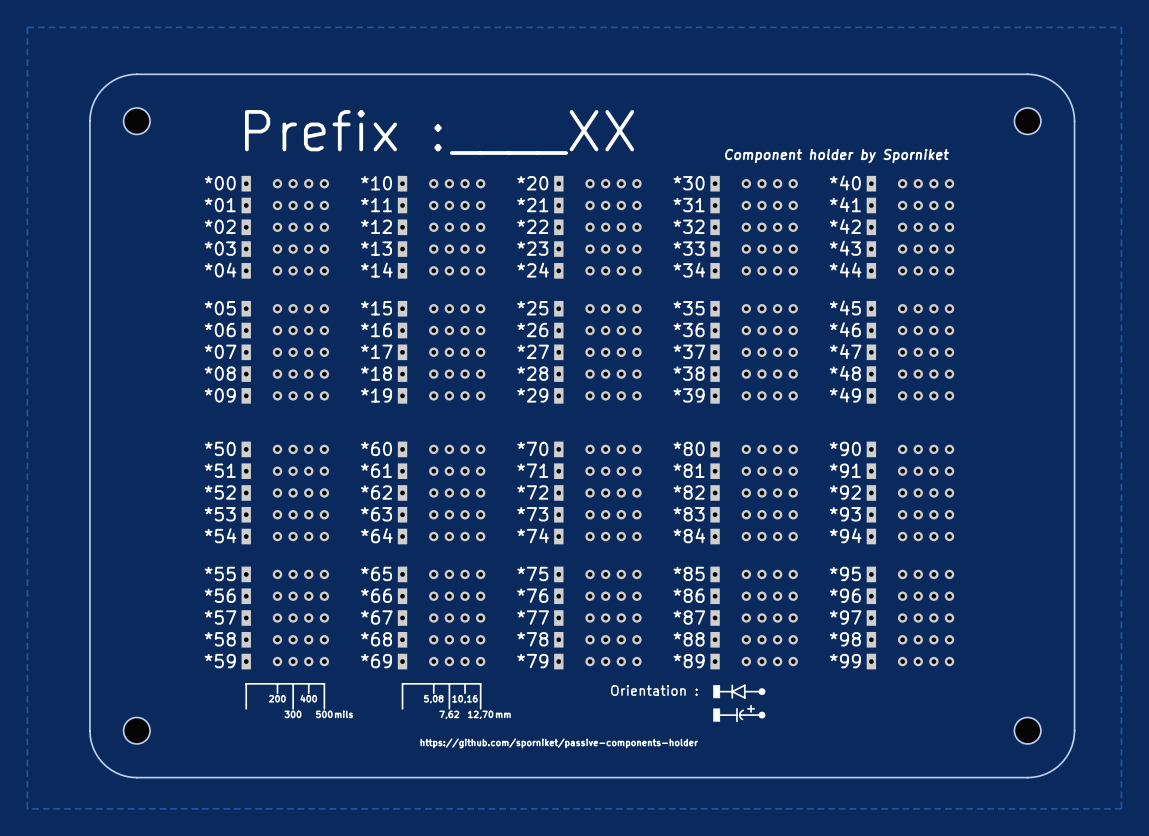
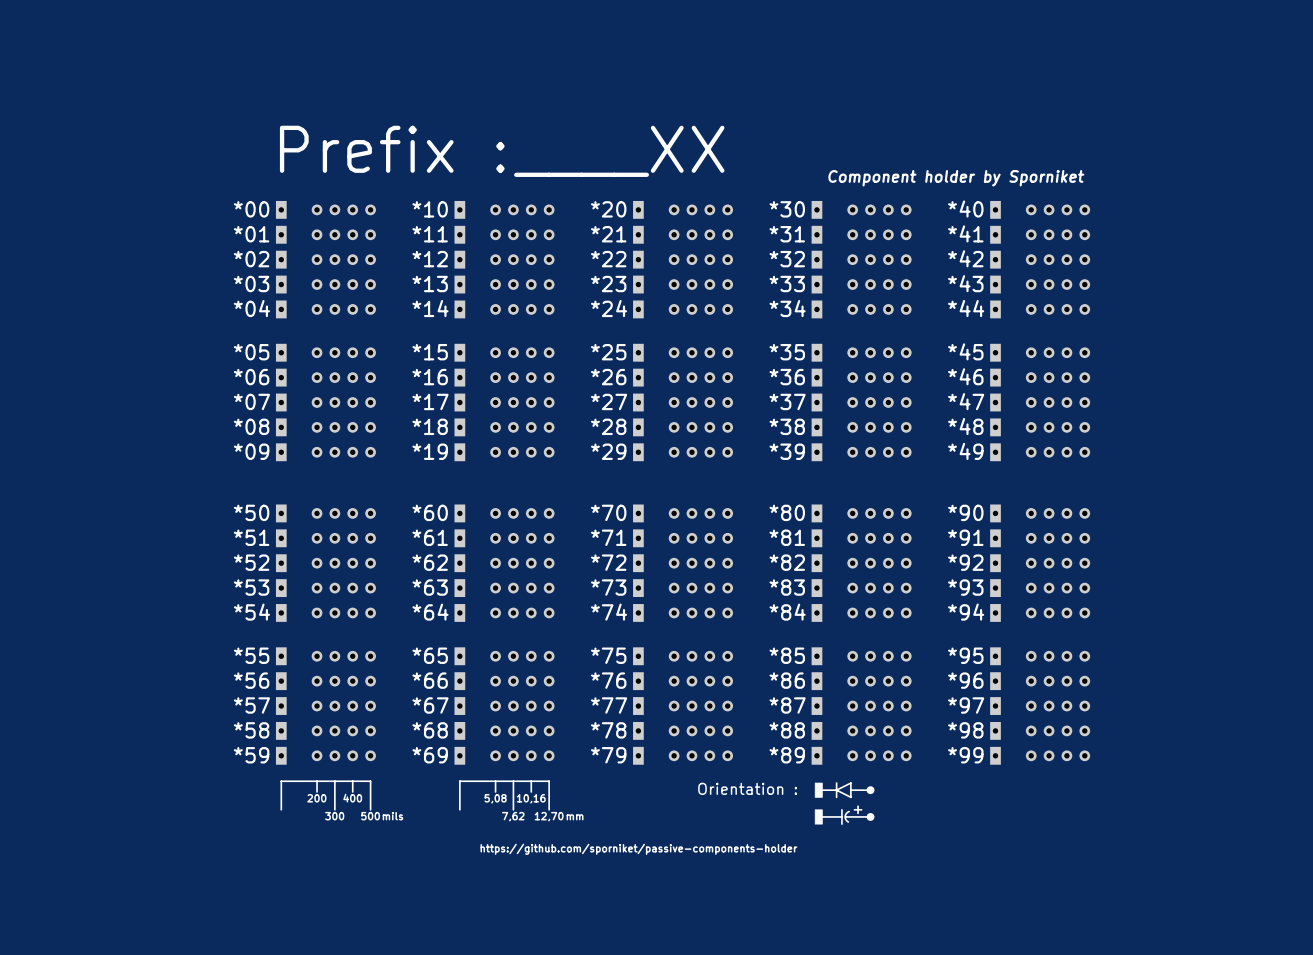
zone outline: (27, 27) (1121, 27) (1121, 808) (27, 808) (27, 27) -> none
board edge: (136, 74) (1027, 74) (1039, 75) (1054, 82) (1063, 91) (1070, 101) (1074, 121) (1074, 730) (1072, 742) (1066, 757) (1057, 766) (1047, 773) (1027, 777) (136, 777) (124, 776) (109, 769) (96, 754) (91, 742) (89, 730) (89, 121) (92, 105) (103, 88) (120, 77) (136, 74) -> none
part: (136, 121) -> none
part: (1027, 121) -> none
part: (136, 730) -> none
part: (1027, 730) -> none

